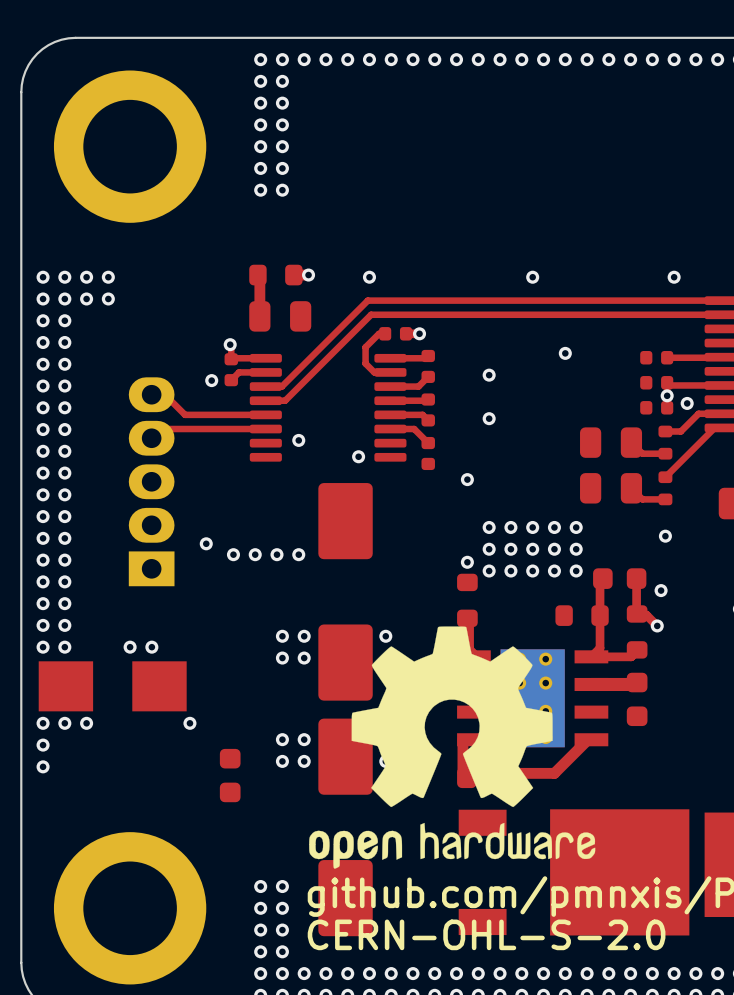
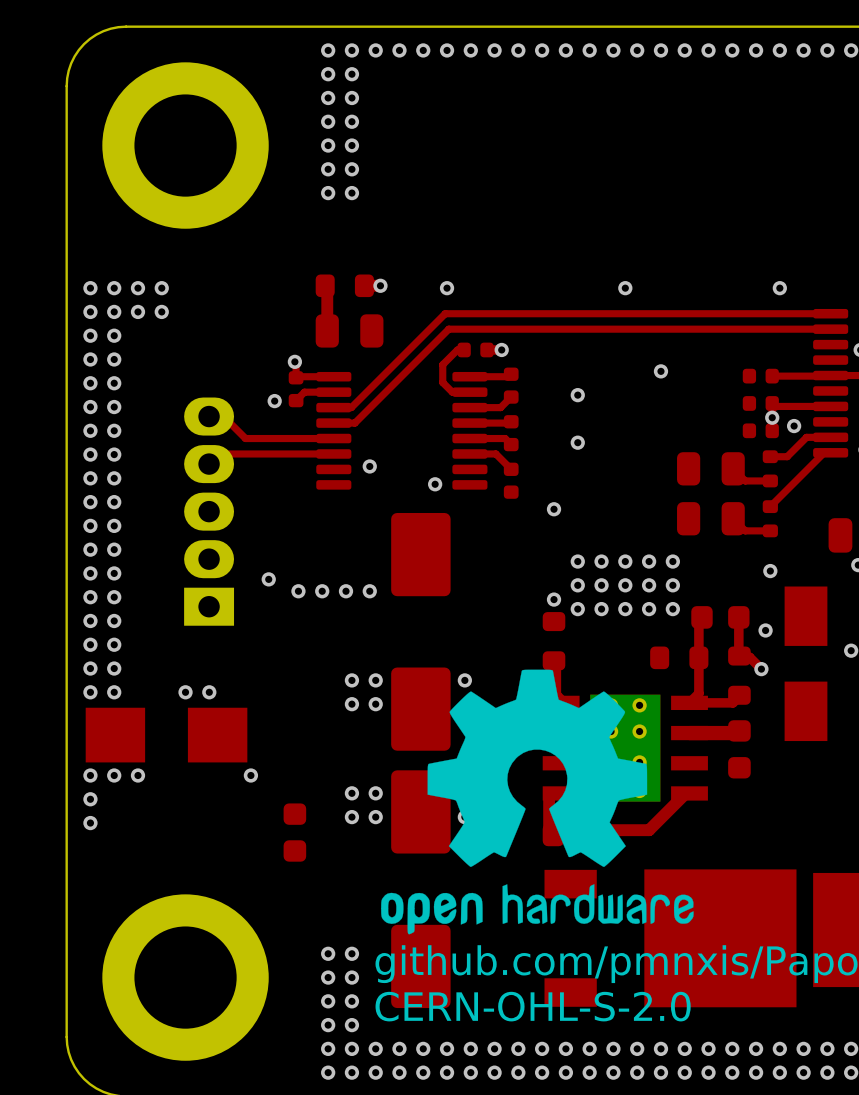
part: none -> (805, 663)

